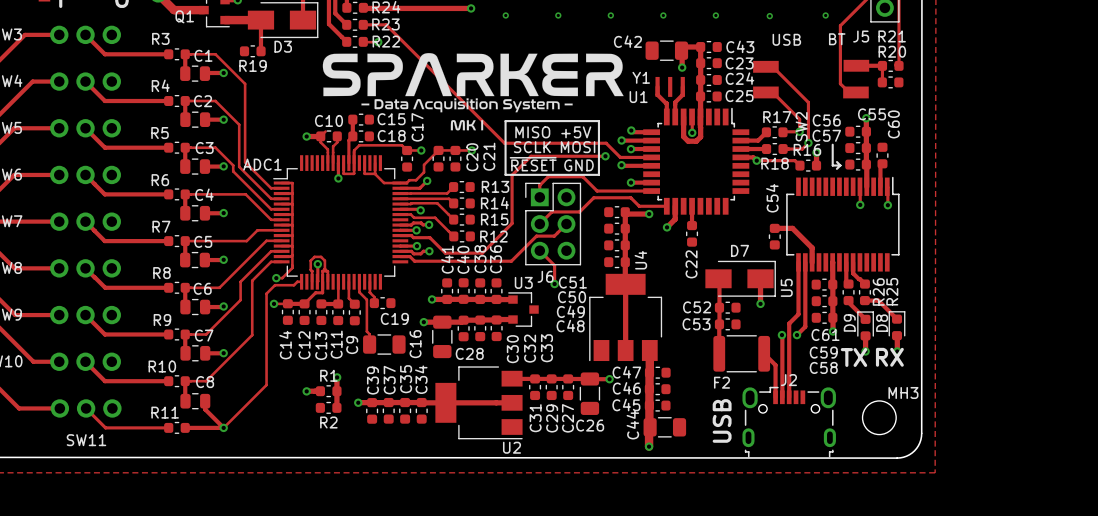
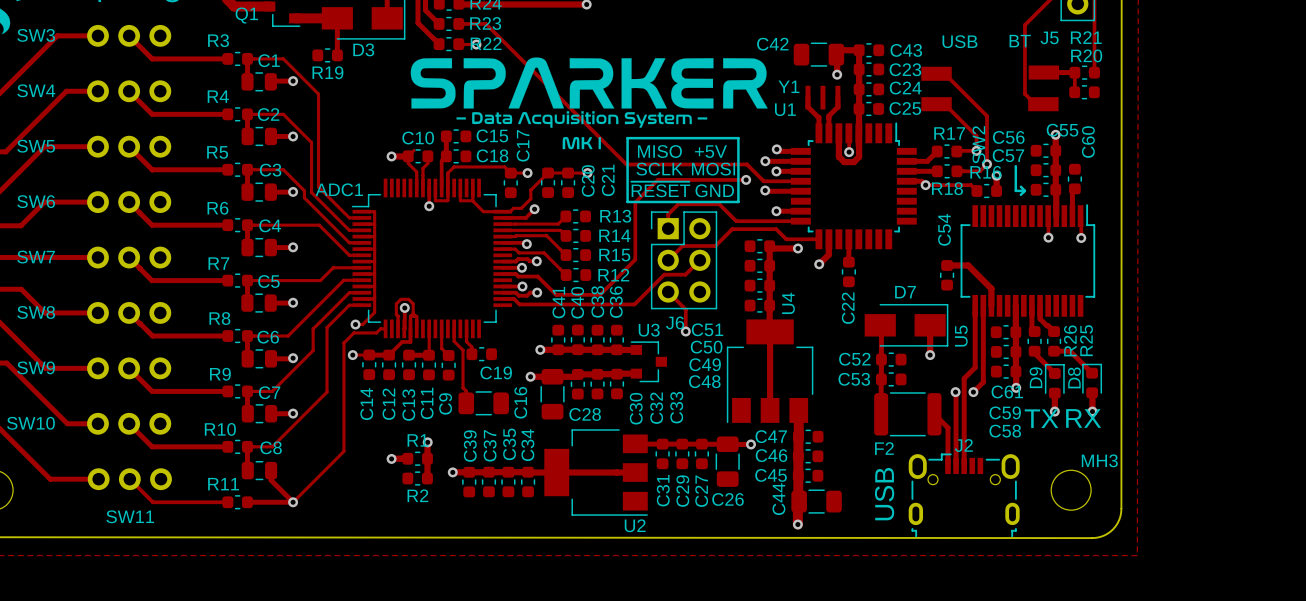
part: (505, 15) -> none
part: (558, 15) -> none
part: (610, 15) -> none
part: (663, 15) -> none
part: (715, 15) -> none
part: (825, 15) -> none
part: (769, 16) -> none

